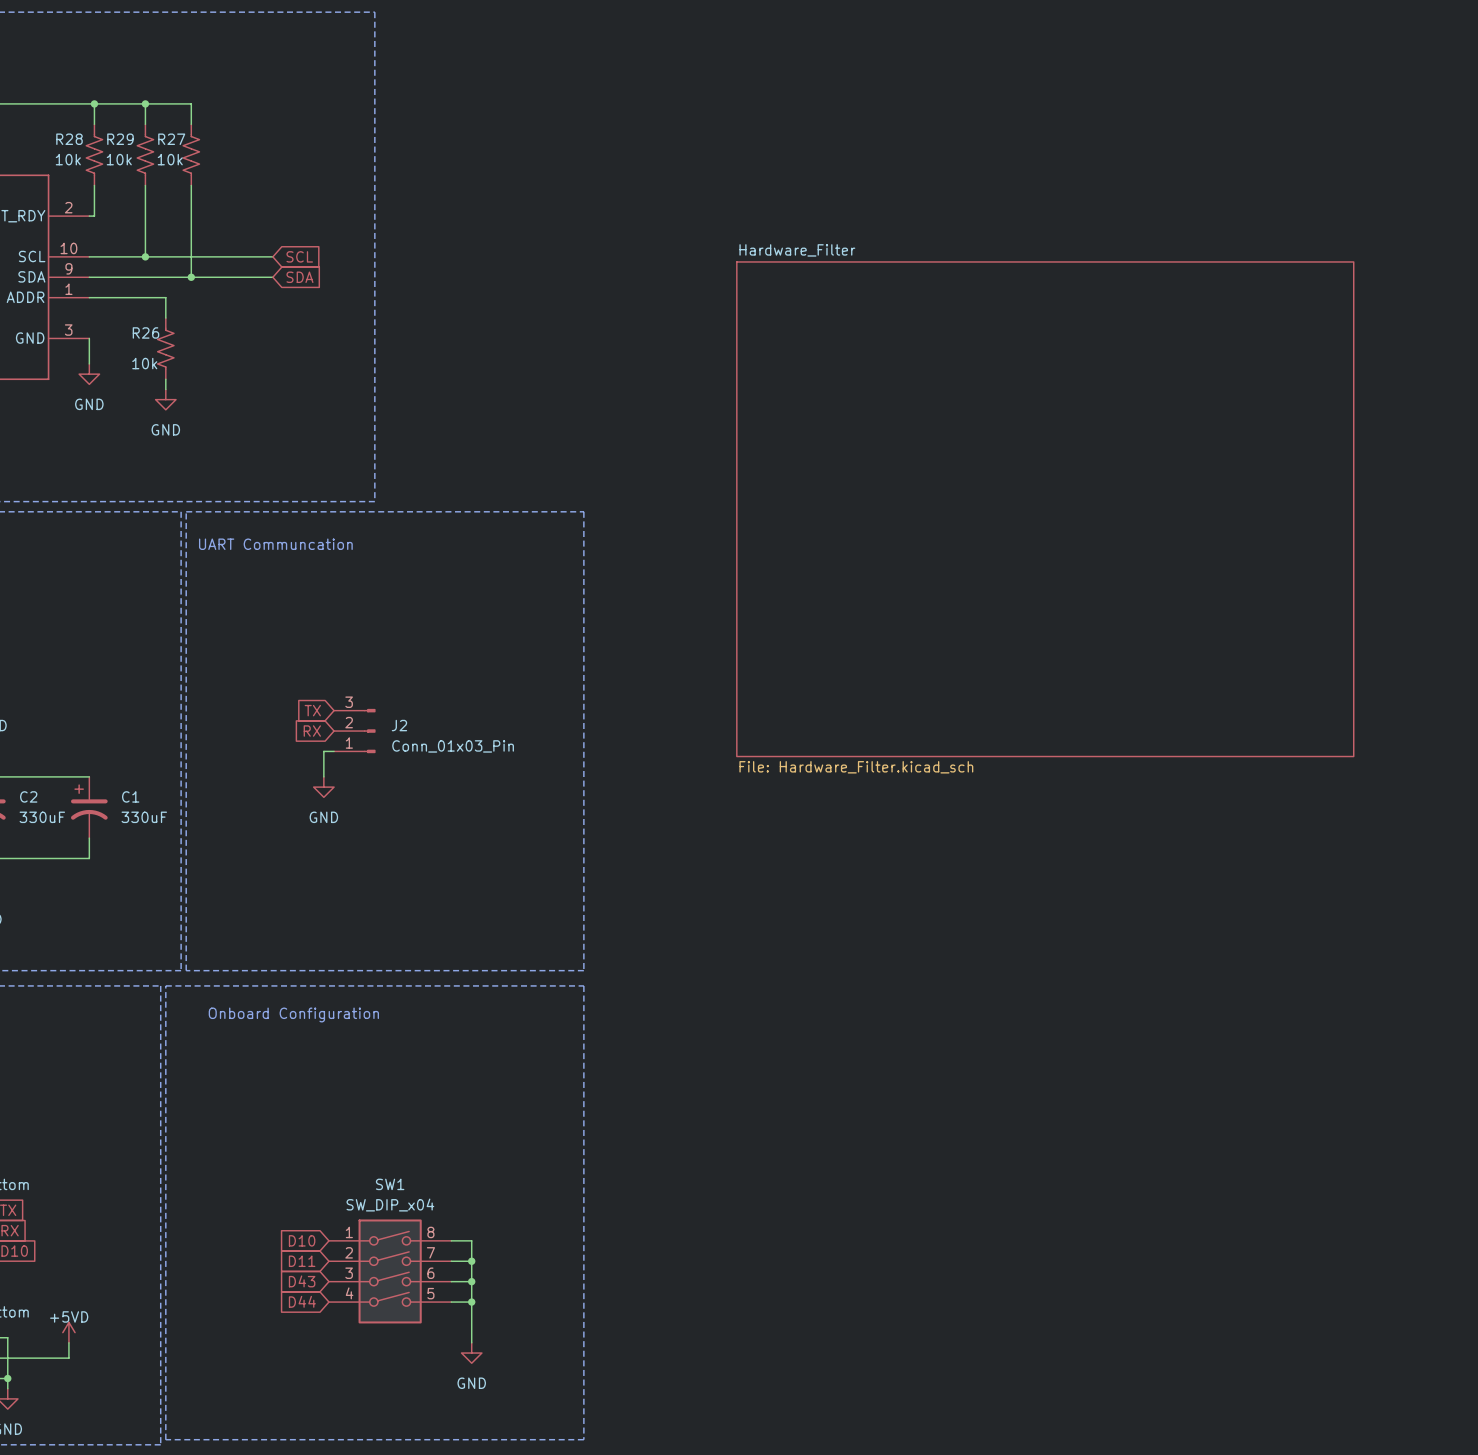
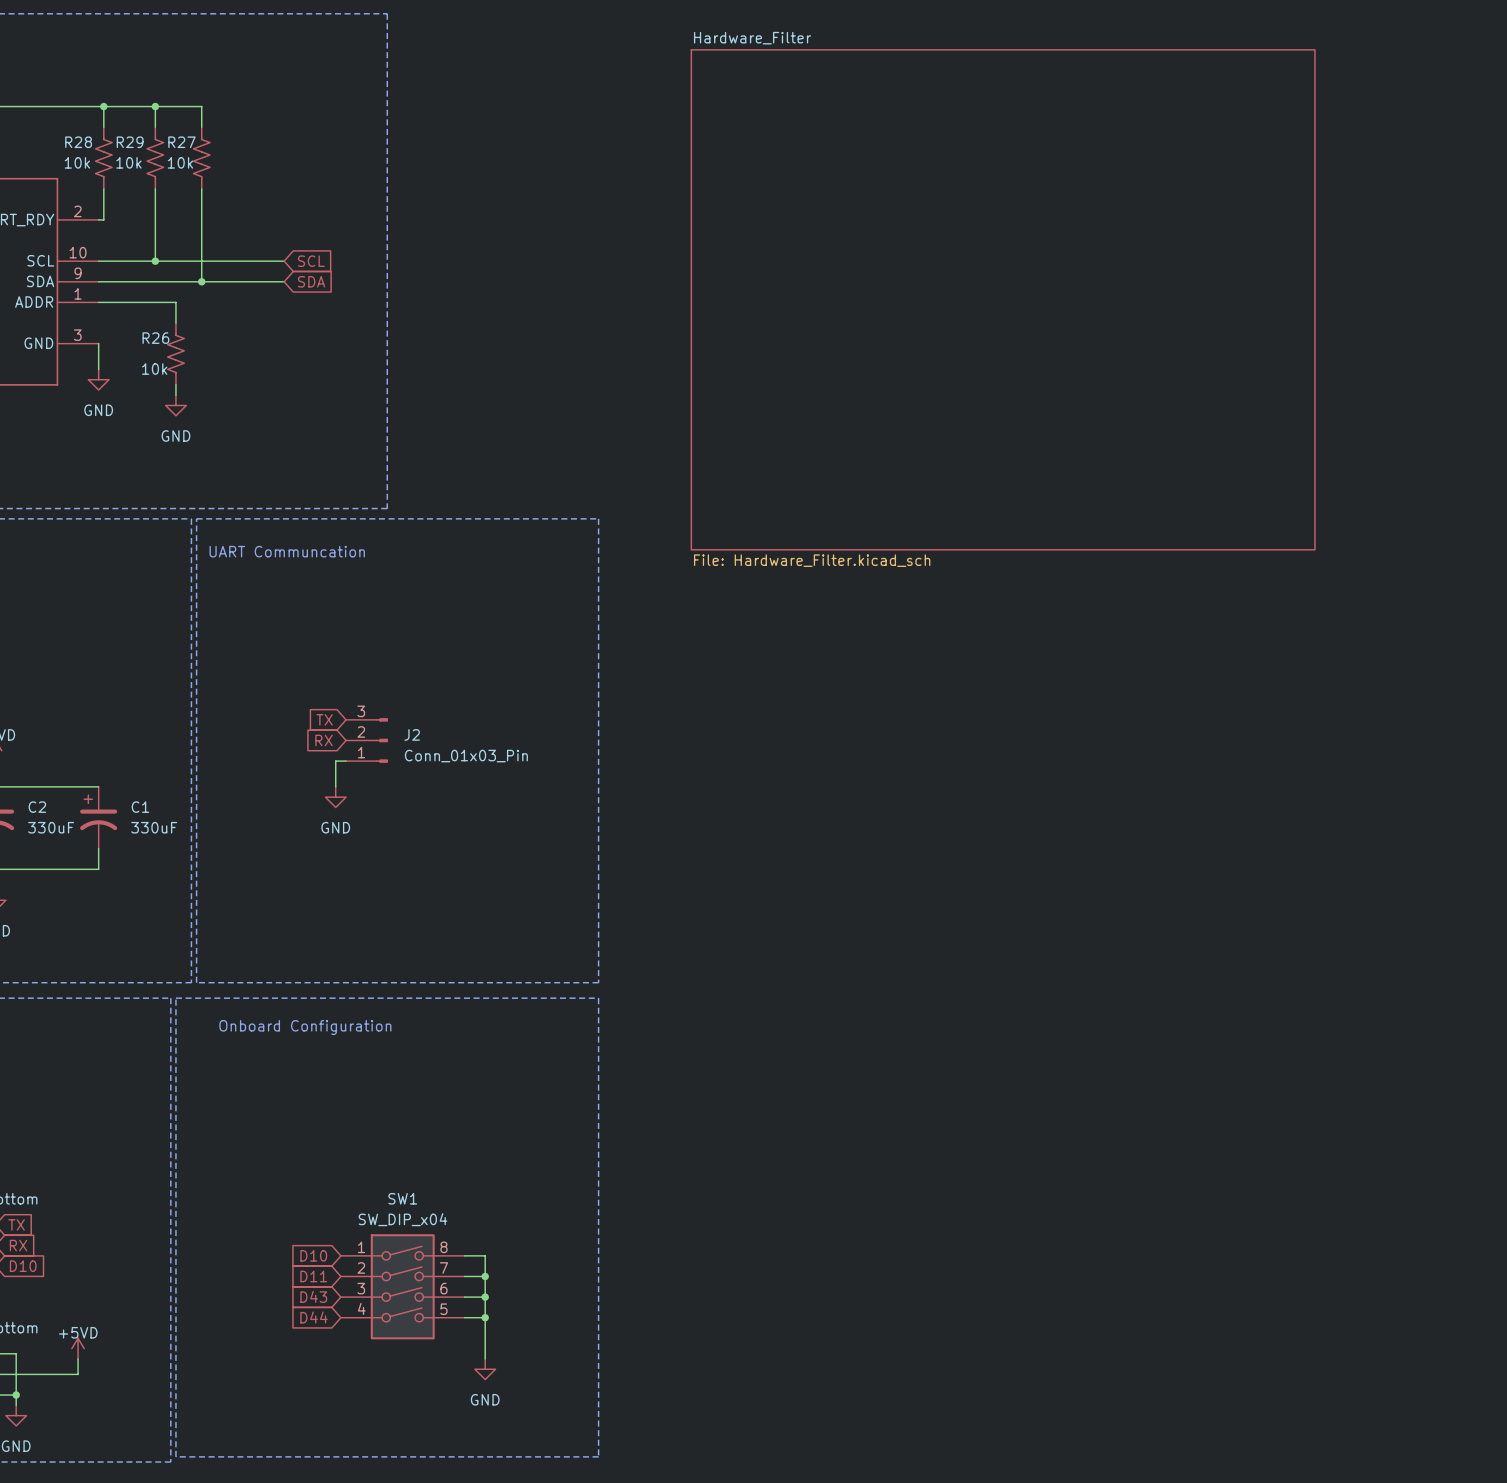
sheet Hardware_Filter: none -> File: Hardware_Filter.kicad_sch (1003, 299)
sheet Hardware_Filter: File: Hardware_Filter.kicad_sch (1045, 509) -> none

